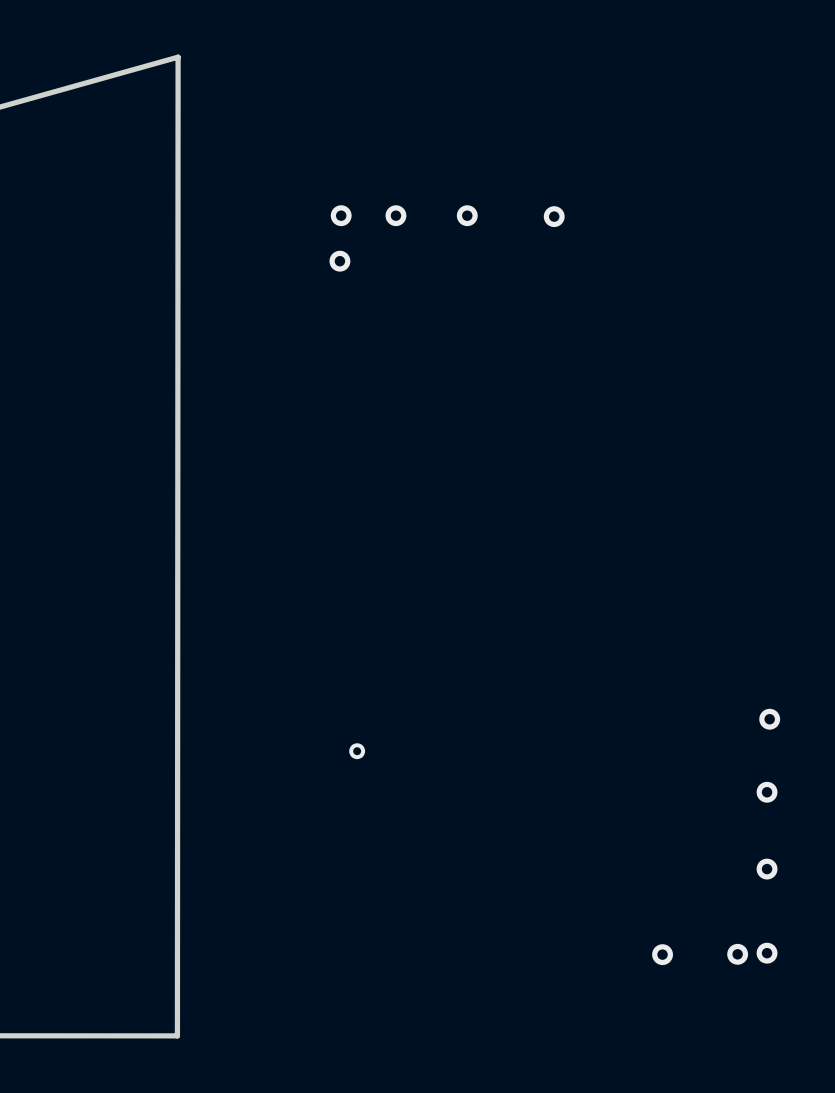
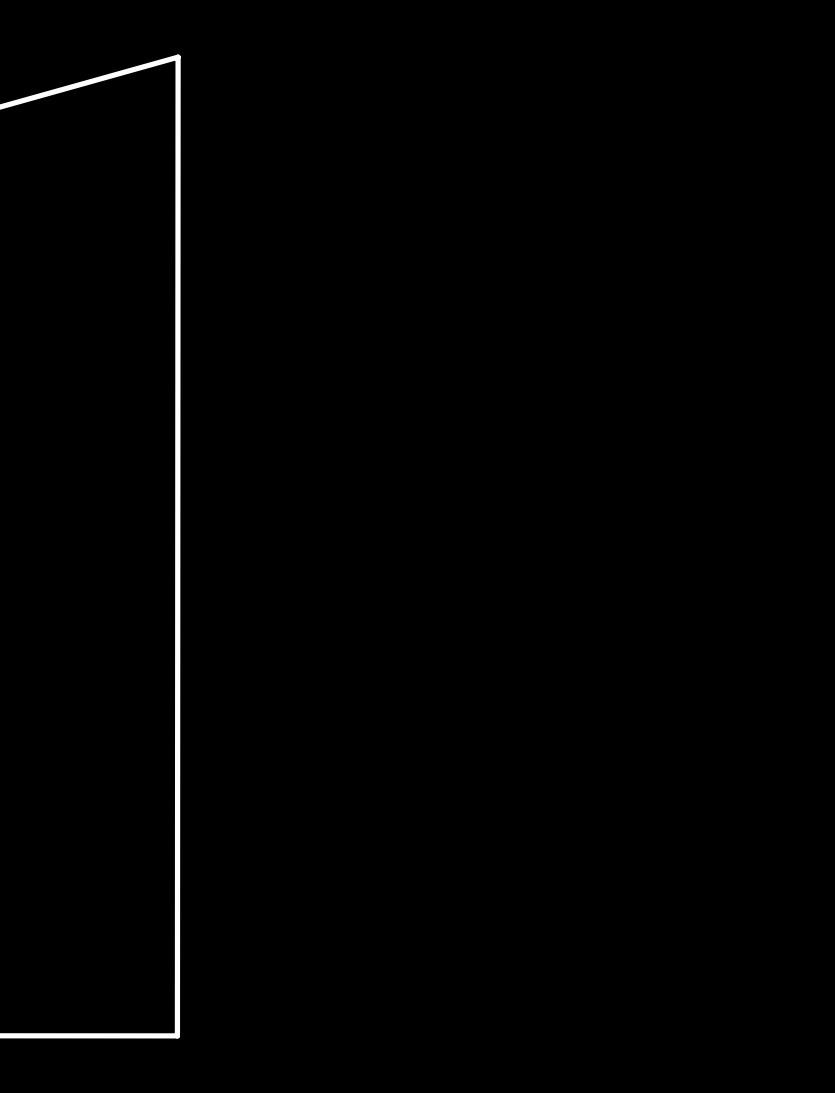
via: (341, 215) -> none
via: (395, 215) -> none
via: (467, 215) -> none
via: (554, 216) -> none
via: (339, 261) -> none
via: (769, 719) -> none
via: (357, 751) -> none
via: (767, 792) -> none
via: (767, 869) -> none
via: (767, 953) -> none
via: (662, 954) -> none
via: (737, 954) -> none

